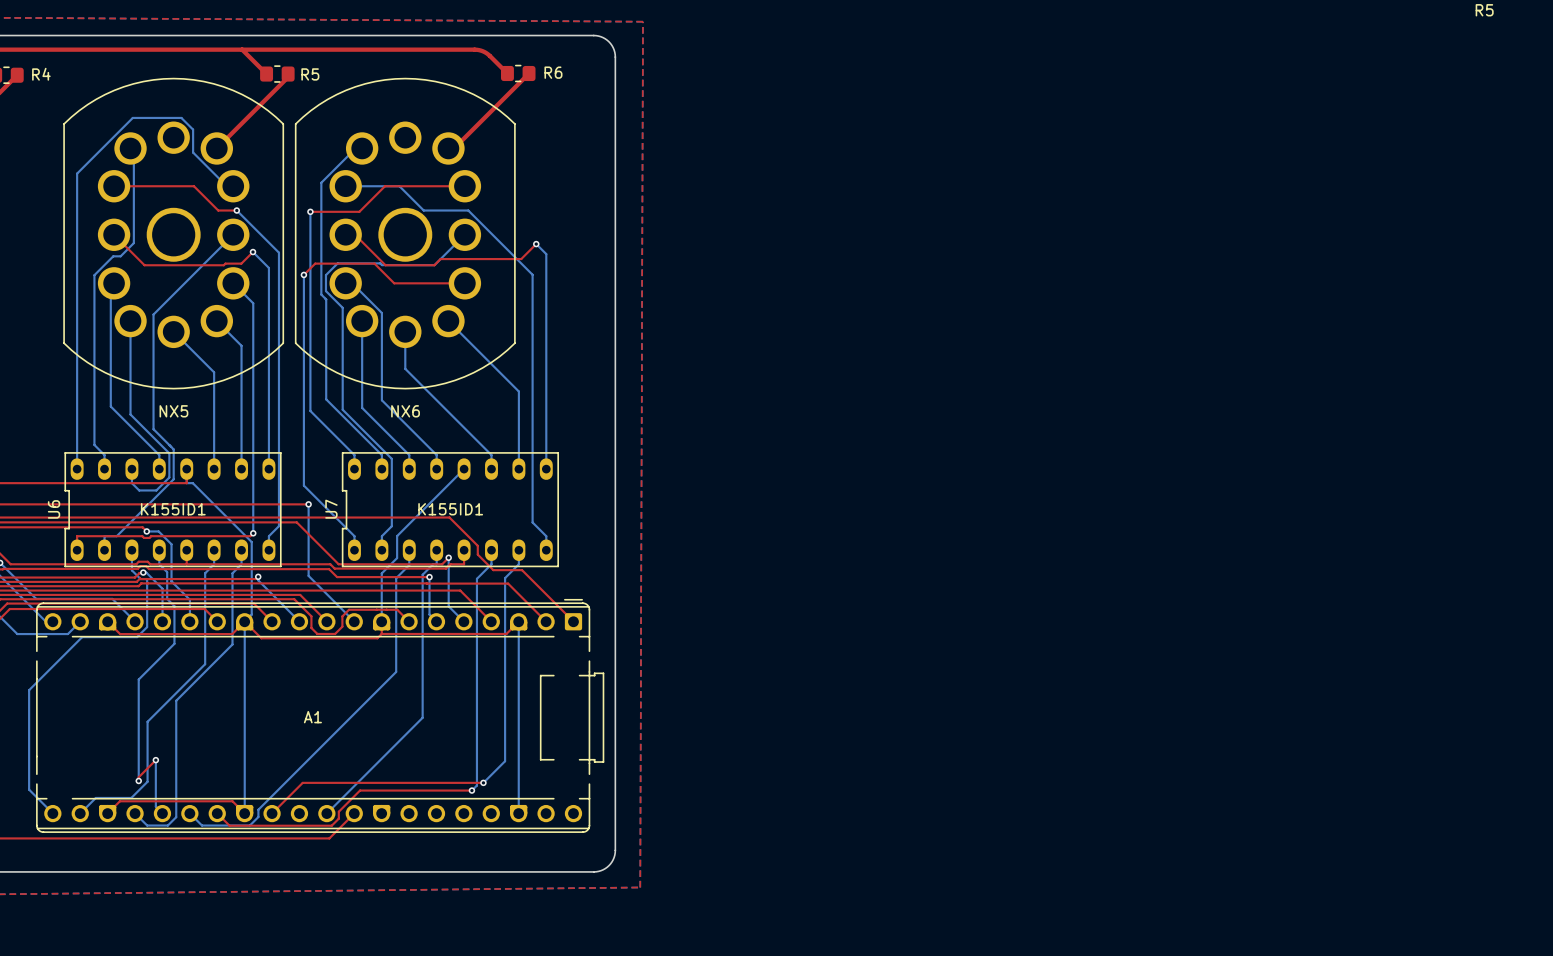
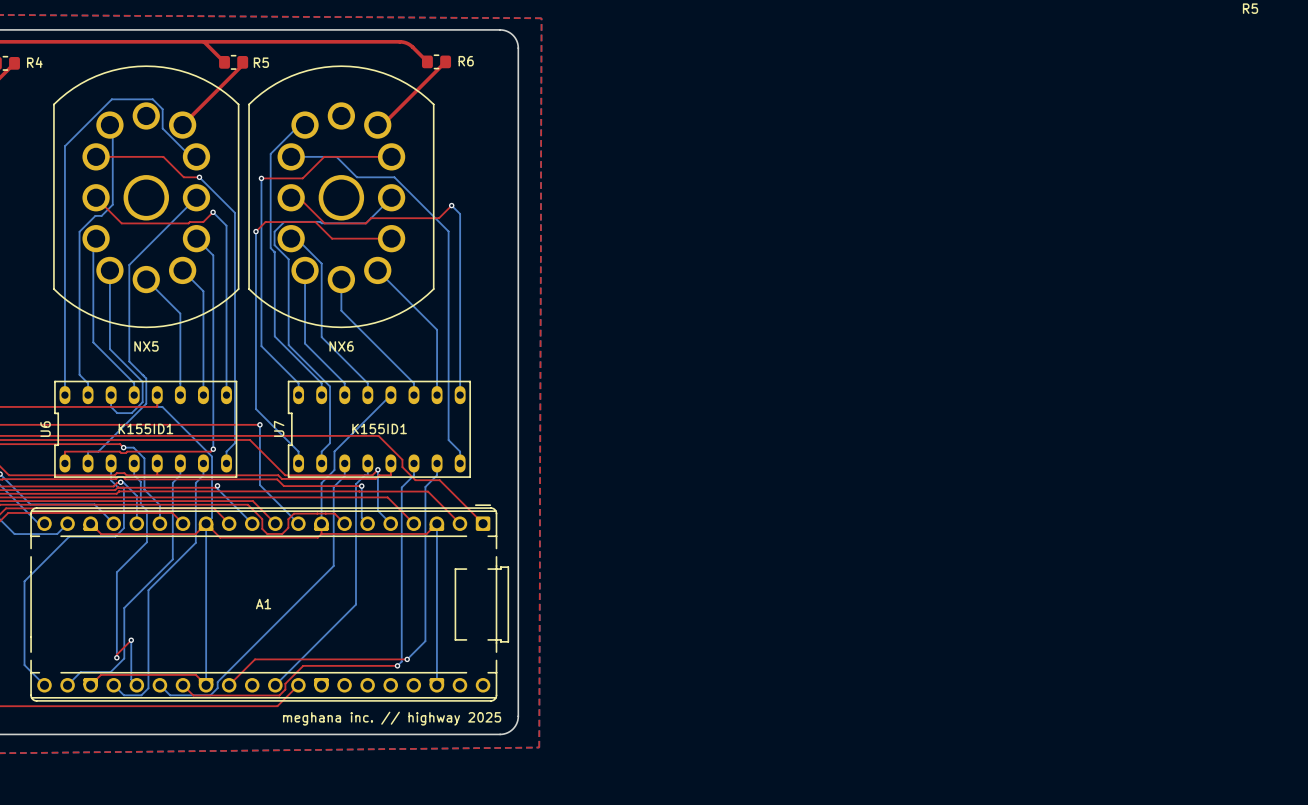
text: none -> meghana inc. // highway 2025 (392, 718)

